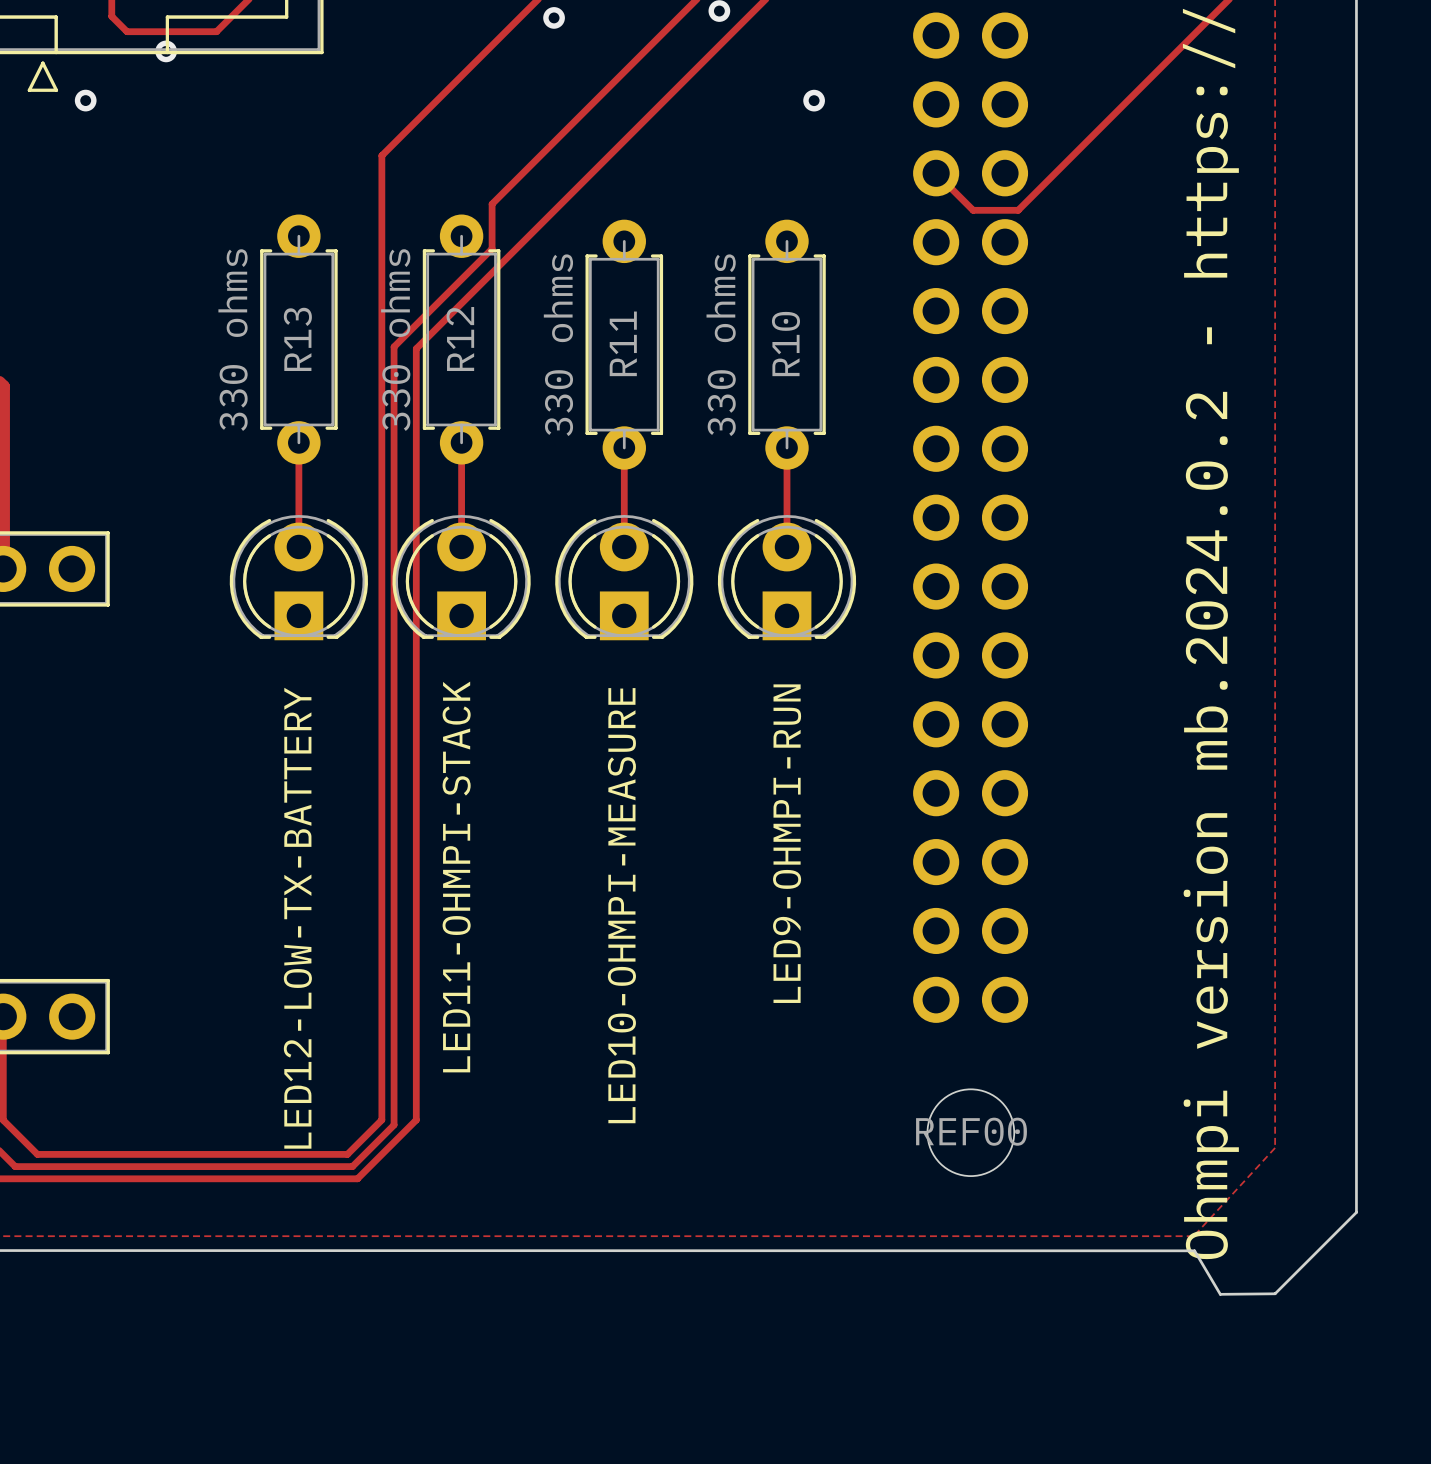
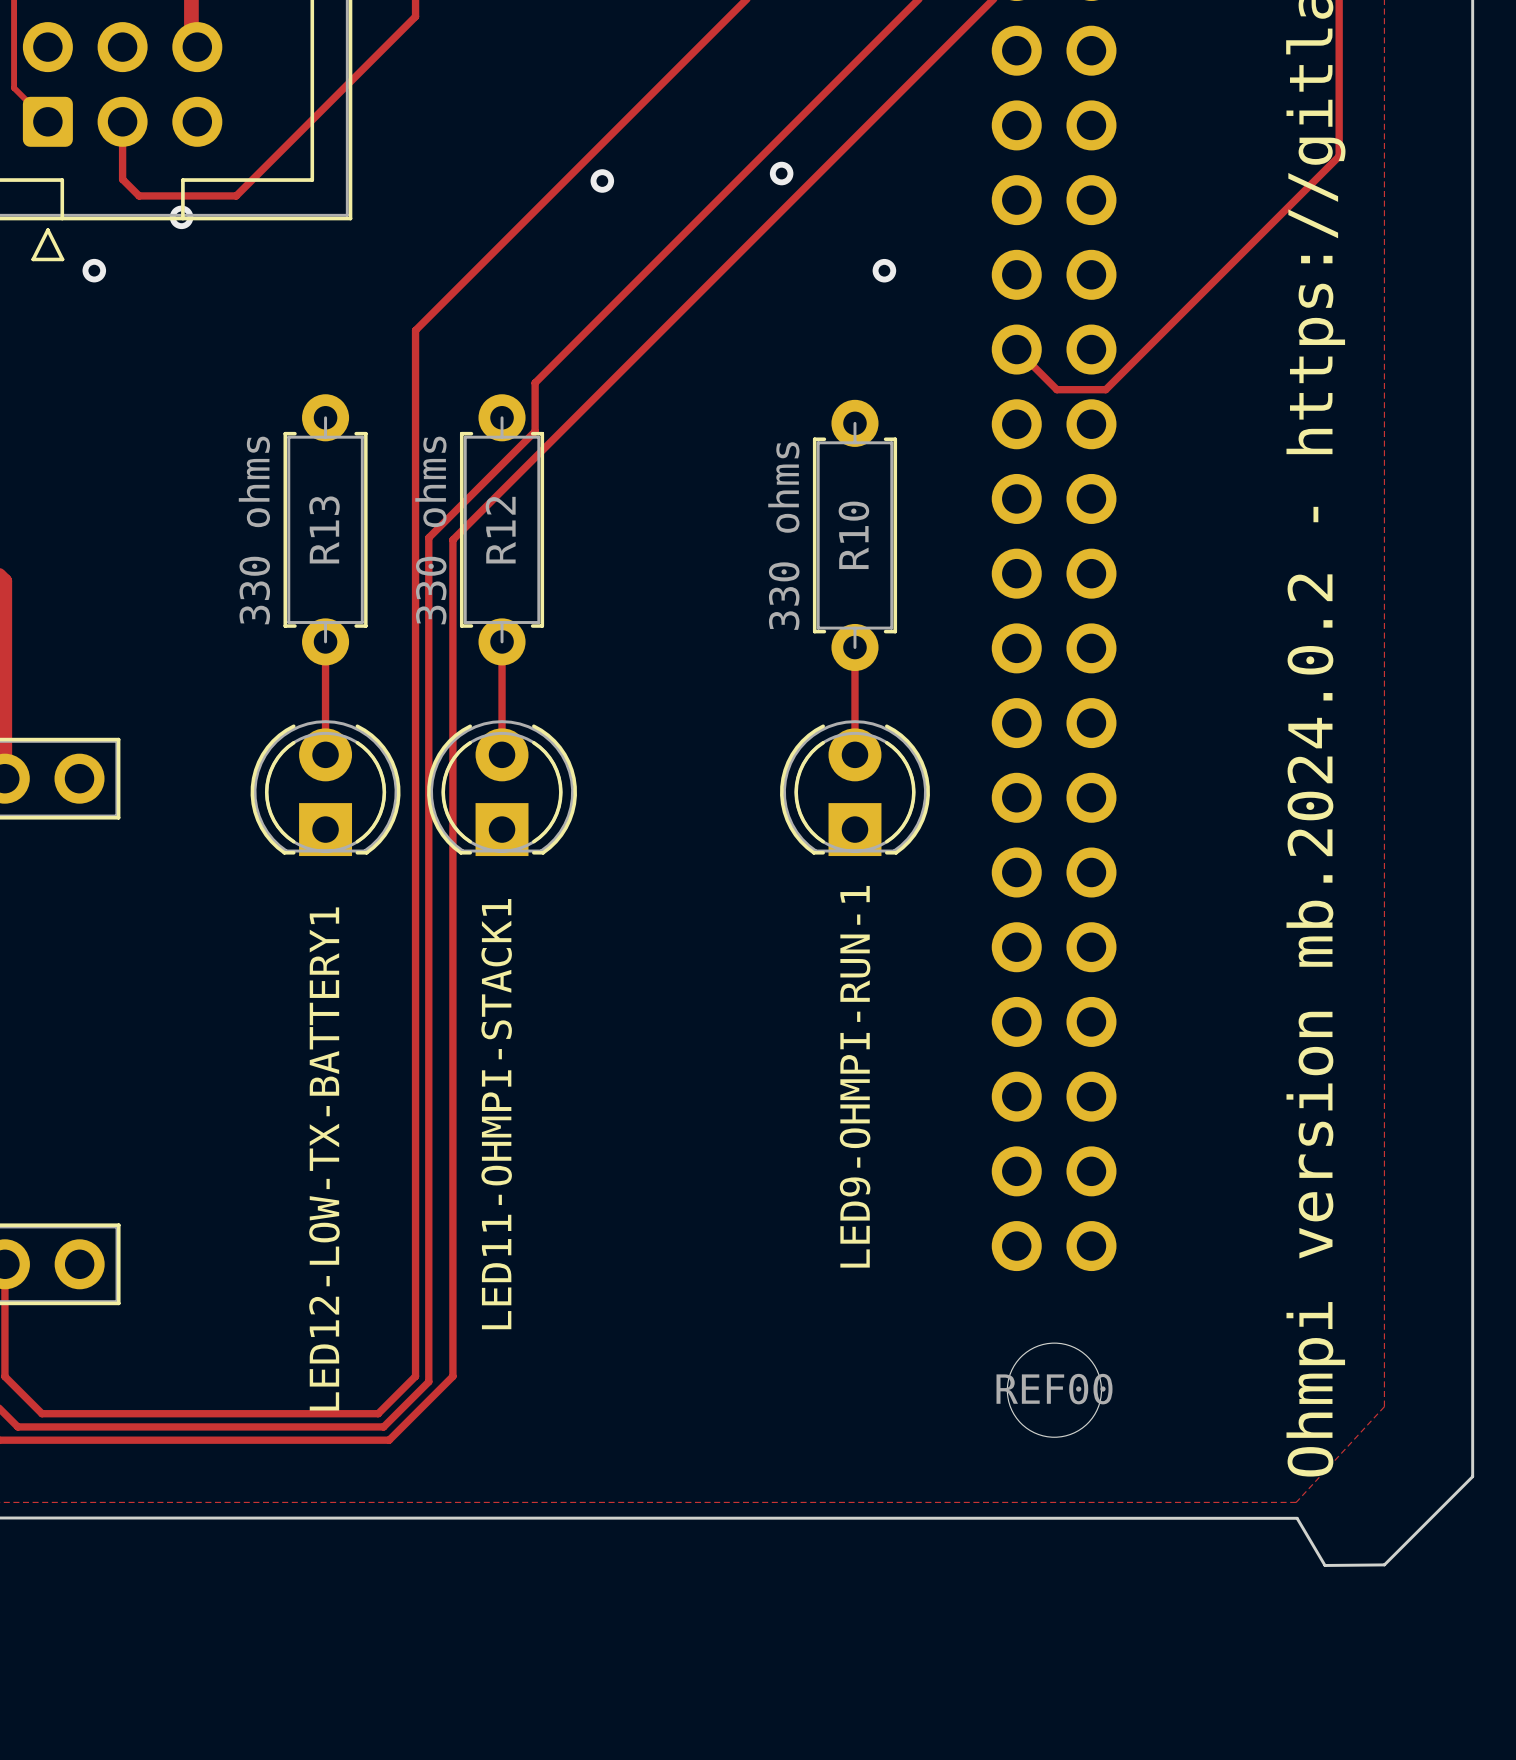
R11: 330 ohms (624, 344) -> none
track: (624, 448) (624, 546) -> none
LED10-OHMPI-MEASURE: (624, 577) -> none
LED9-OHMPI-RUN name: LED9-OHMPI-RUN (787, 843) -> LED9-OHMPI-RUN-1 (855, 1076)
LED11-OHMPI-STACK name: LED11-OHMPI-STACK (456, 876) -> LED11-OHMPI-STACK1 (496, 1114)
LED12-LOW-TX-BATTERY name: LED12-LOW-TX-BATTERY (297, 918) -> LED12-LOW-TX-BATTERY1 (324, 1158)

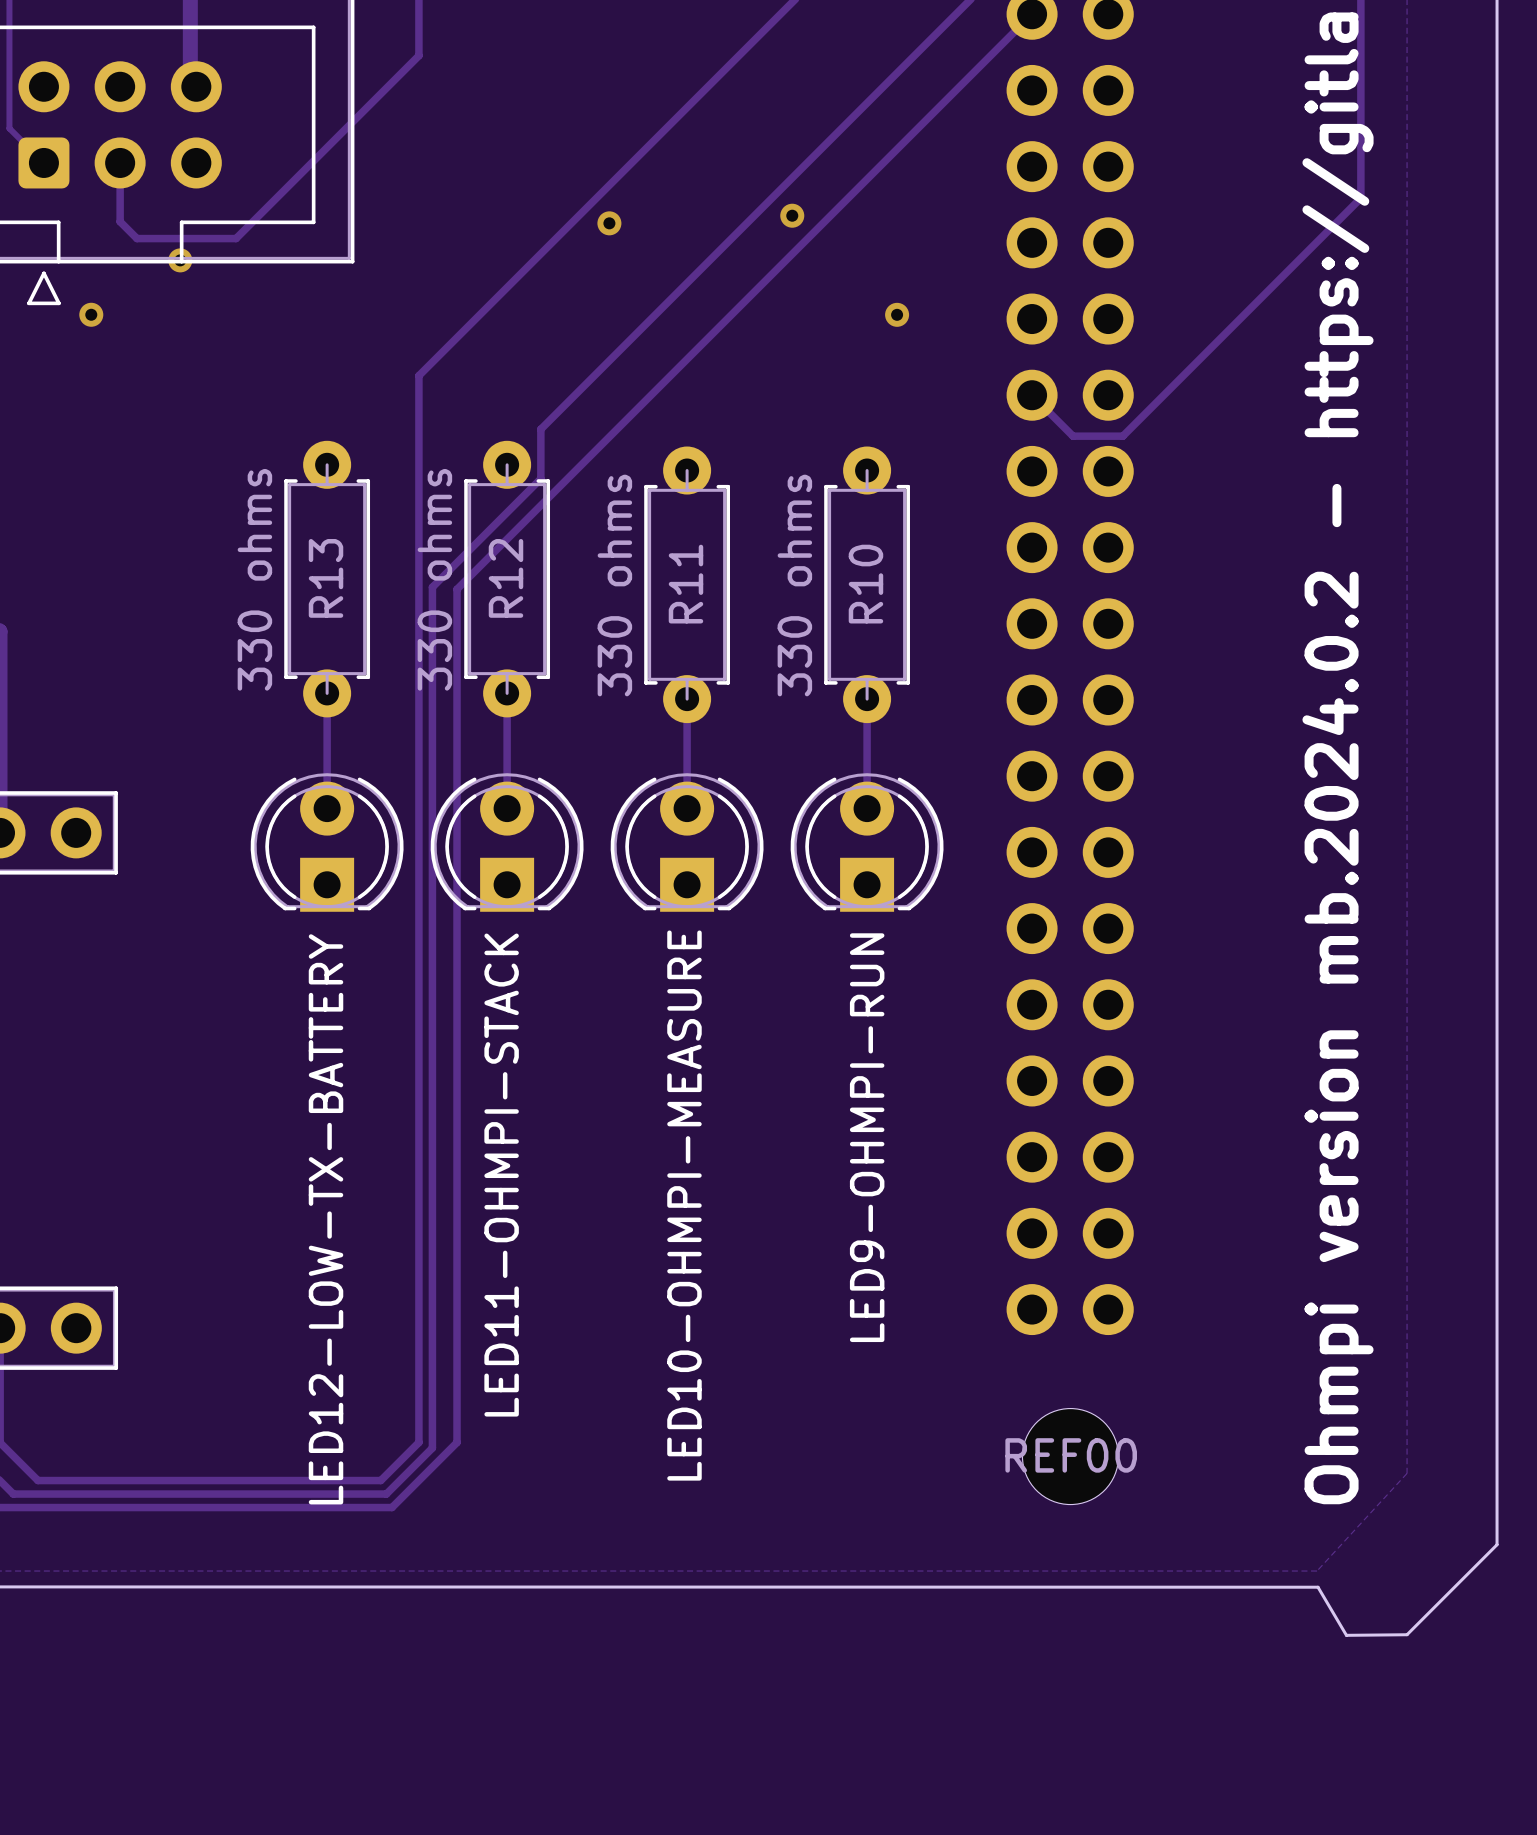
R11: none -> 330 ohms (687, 584)
track: none -> (687, 699) (687, 808)
LED10-OHMPI-MEASURE: none -> (687, 842)
LED9-OHMPI-RUN-1 name: LED9-OHMPI-RUN-1 (855, 1076) -> LED9-OHMPI-RUN (867, 1137)
LED11-OHMPI-STACK1 name: LED11-OHMPI-STACK1 (496, 1114) -> LED11-OHMPI-STACK (501, 1175)
LED12-LOW-TX-BATTERY1 name: LED12-LOW-TX-BATTERY1 (324, 1158) -> LED12-LOW-TX-BATTERY (326, 1219)

